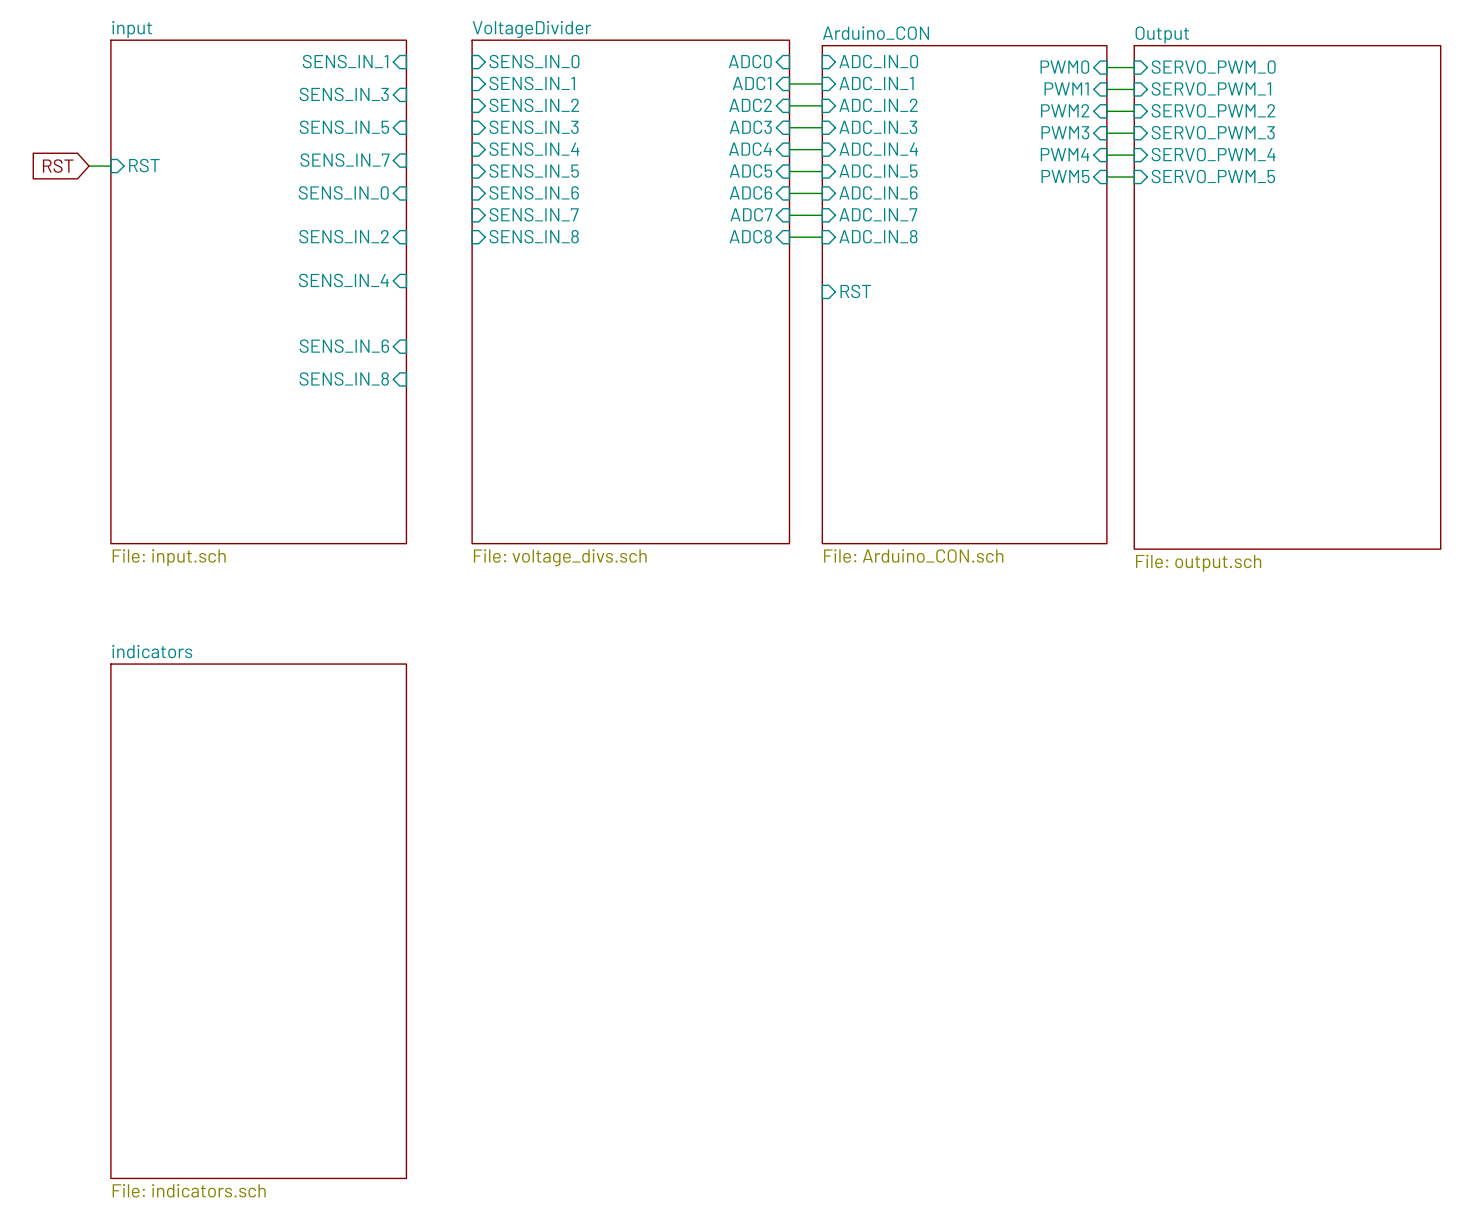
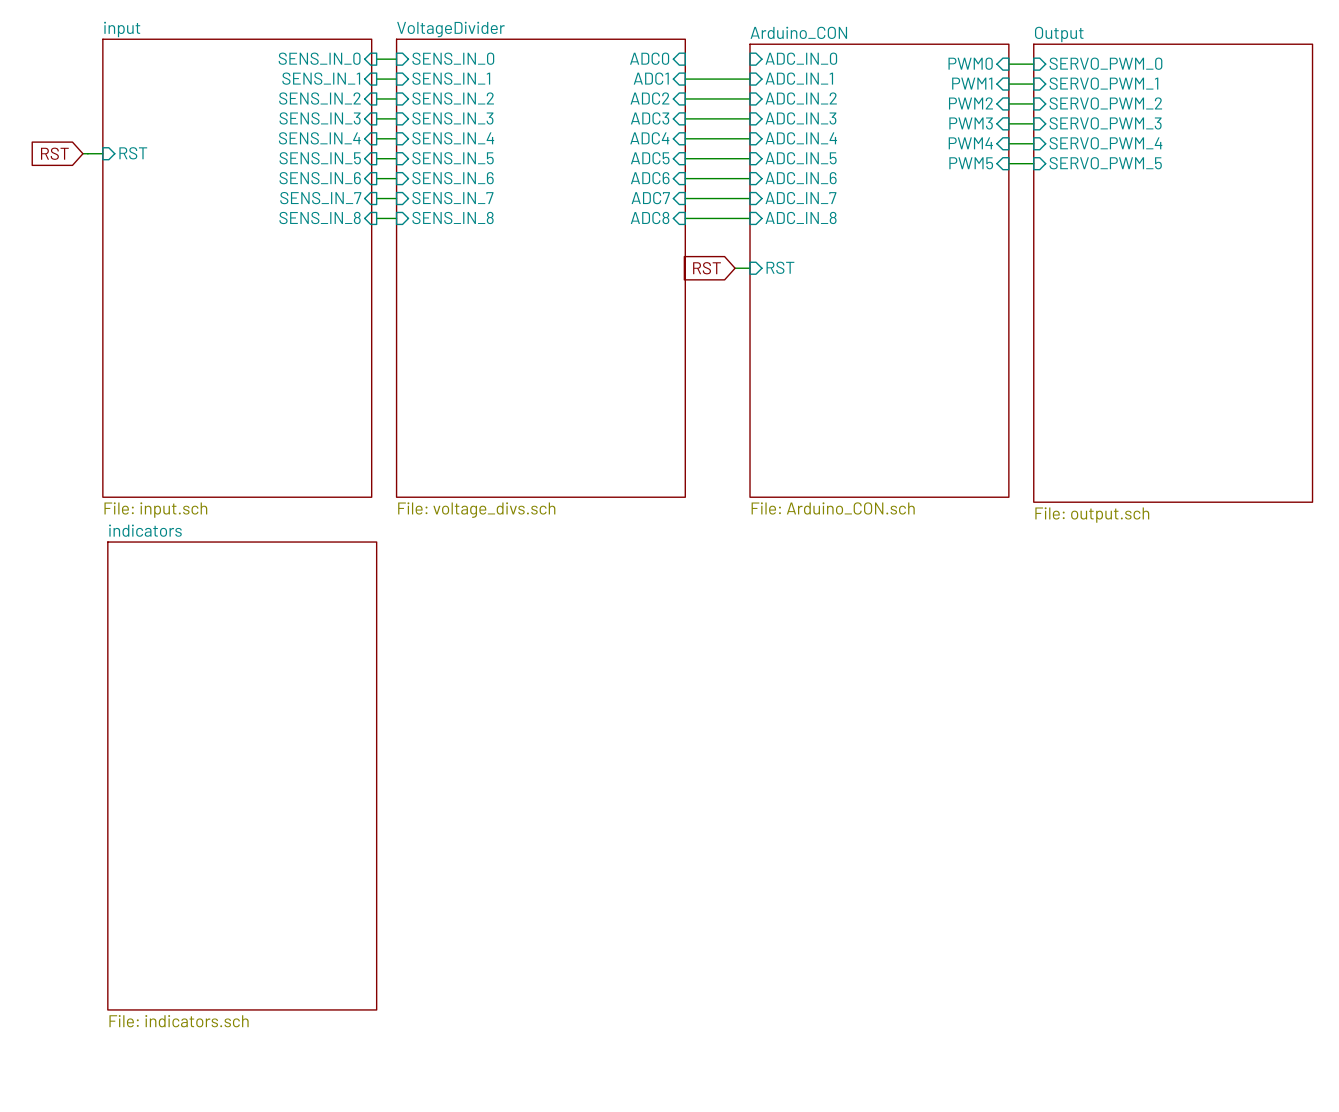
sheet pin position: SENS_IN_1 (345, 61) -> SENS_IN_1 (321, 78)
sheet pin: none -> SENS_IN_0 (319, 58)
sheet pin position: SENS_IN_0 (534, 61) -> SENS_IN_0 (453, 58)
sheet pin position: ADC0 (750, 61) -> ADC0 (649, 58)
wire: none -> (376, 59) (396, 59)
wire: none -> (376, 79) (396, 79)
sheet pin position: SENS_IN_1 (532, 83) -> SENS_IN_1 (451, 78)
wire: none -> (685, 79) (720, 79)
sheet pin position: ADC1 (752, 83) -> ADC1 (651, 78)
sheet pin position: SENS_IN_3 (344, 94) -> SENS_IN_3 (320, 118)
sheet pin: none -> SENS_IN_2 (319, 98)
wire: none -> (376, 98) (396, 98)
sheet pin position: SENS_IN_2 (534, 105) -> SENS_IN_2 (453, 98)
sheet pin position: ADC2 (750, 105) -> ADC2 (649, 98)
wire: none -> (685, 98) (720, 98)
sheet pin: SENS_IN_5 (344, 127) -> none
wire: none -> (376, 118) (396, 118)
sheet pin position: SENS_IN_3 (534, 127) -> SENS_IN_3 (452, 118)
sheet pin position: ADC3 (750, 127) -> ADC3 (650, 118)
wire: none -> (685, 118) (720, 118)
sheet pin: none -> SENS_IN_4 (319, 138)
wire: none -> (376, 138) (396, 138)
sheet pin position: SENS_IN_4 (534, 149) -> SENS_IN_4 (453, 138)
sheet pin position: ADC4 (750, 149) -> ADC4 (649, 138)
wire: none -> (685, 138) (720, 138)
sheet pin: SENS_IN_7 (345, 160) -> none
sheet pin: none -> SENS_IN_5 (320, 158)
wire: none -> (376, 158) (396, 158)
sheet pin position: SENS_IN_5 (534, 171) -> SENS_IN_5 (453, 158)
sheet pin position: ADC5 (750, 171) -> ADC5 (650, 158)
wire: none -> (685, 158) (720, 158)
sheet pin: SENS_IN_0 (343, 192) -> SENS_IN_6 (320, 178)
sheet pin position: SENS_IN_6 (534, 192) -> SENS_IN_6 (453, 178)
sheet pin position: ADC6 (750, 192) -> ADC6 (650, 178)
wire: none -> (376, 178) (396, 178)
wire: none -> (685, 178) (720, 178)
sheet pin: none -> SENS_IN_7 (320, 198)
sheet pin position: SENS_IN_7 (534, 214) -> SENS_IN_7 (452, 198)
sheet pin position: ADC7 (751, 214) -> ADC7 (650, 198)
wire: none -> (376, 198) (396, 198)
wire: none -> (685, 198) (720, 198)
sheet pin: SENS_IN_2 (344, 236) -> SENS_IN_8 (320, 217)
sheet pin position: SENS_IN_8 (534, 236) -> SENS_IN_8 (453, 217)
sheet pin position: ADC8 (750, 236) -> ADC8 (650, 217)
wire: none -> (376, 218) (396, 218)
wire: none -> (685, 218) (720, 218)
sheet pin: SENS_IN_4 (343, 280) -> none
sheet VoltageDivider position: (630, 291) -> (540, 268)
global label: none -> RST (707, 268)
wire: none -> (735, 268) (750, 268)
sheet pin: SENS_IN_6 (344, 346) -> none
sheet pin: SENS_IN_8 (344, 378) -> none
sheet indicators position: (258, 921) -> (242, 775)

